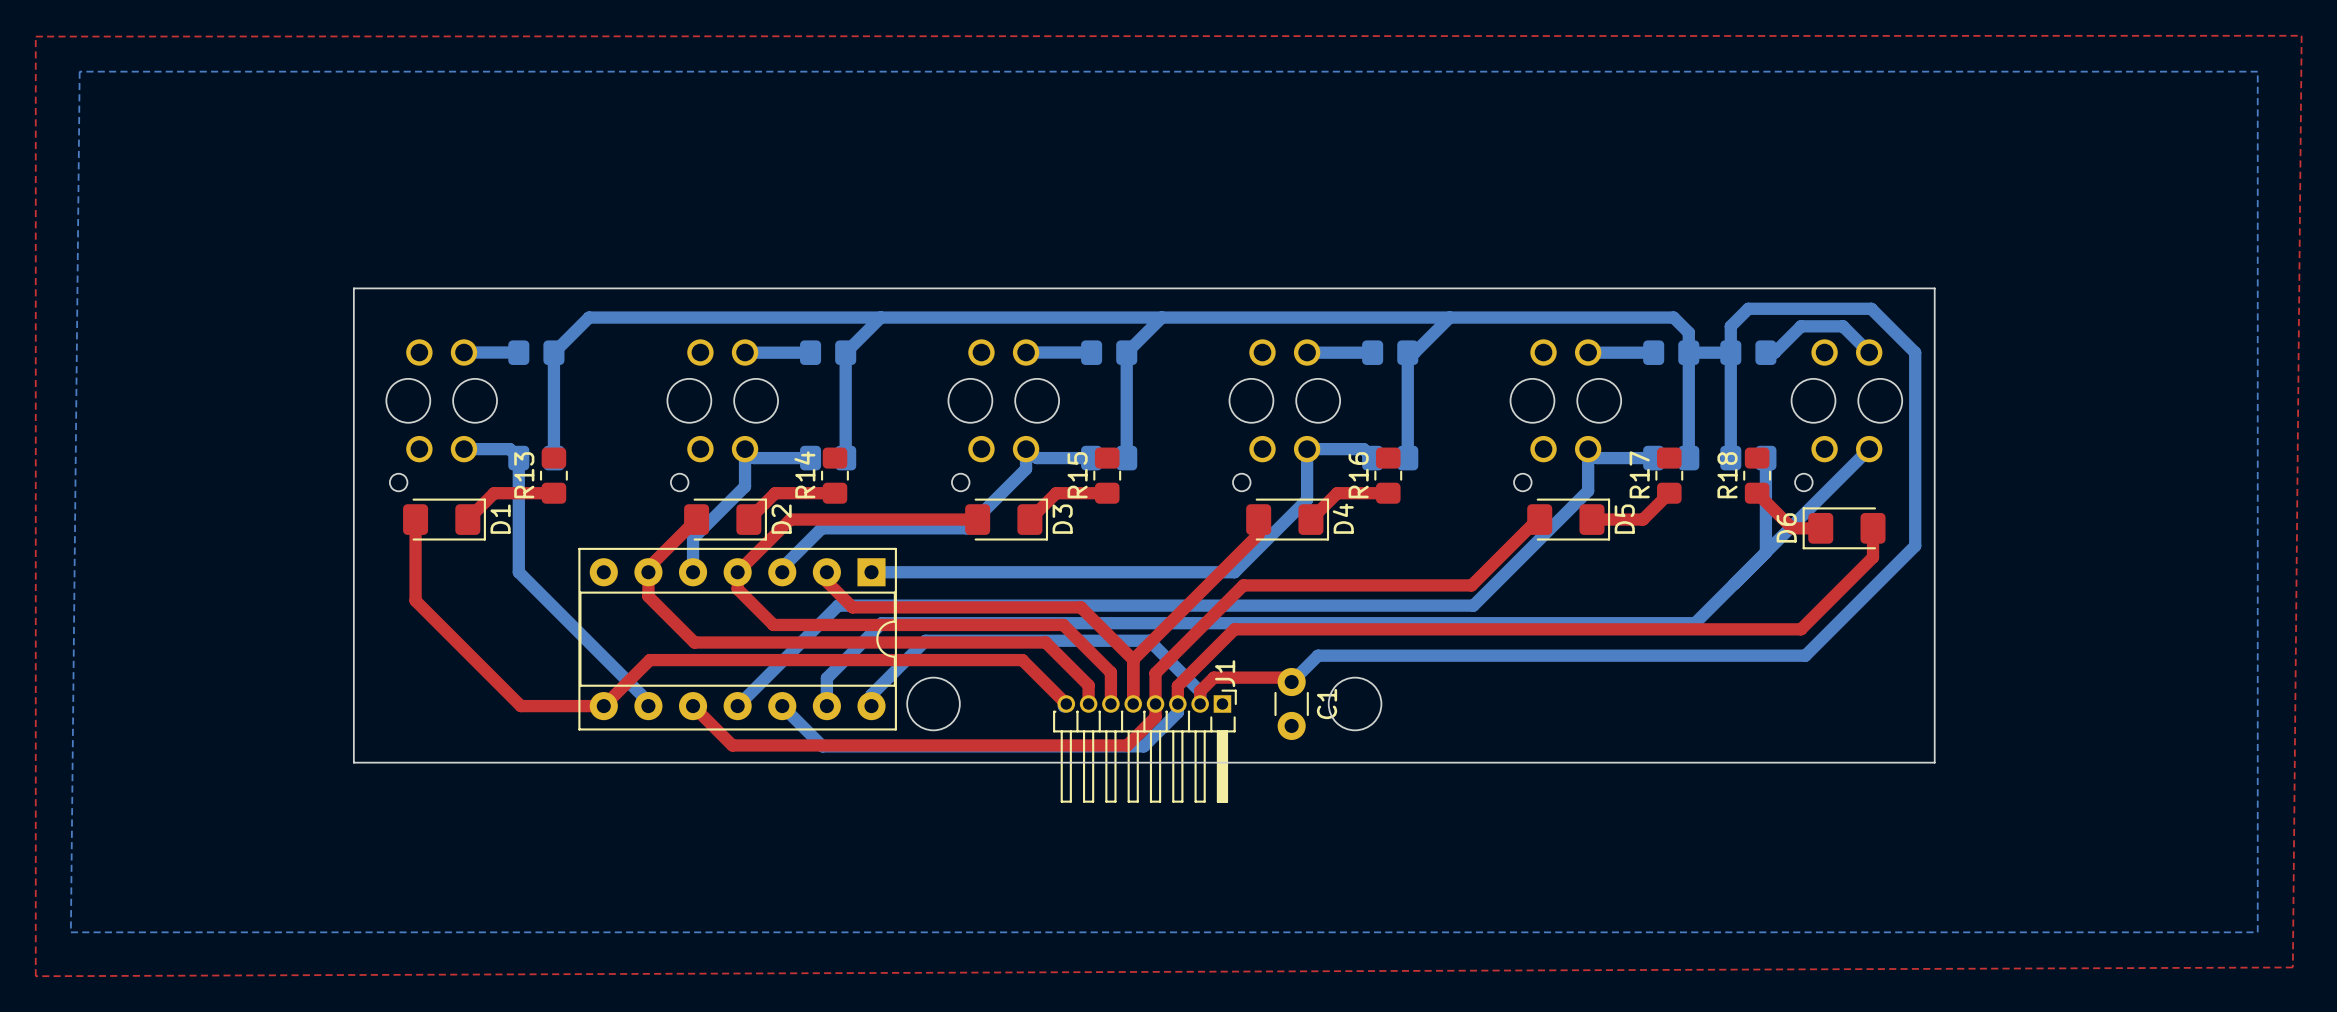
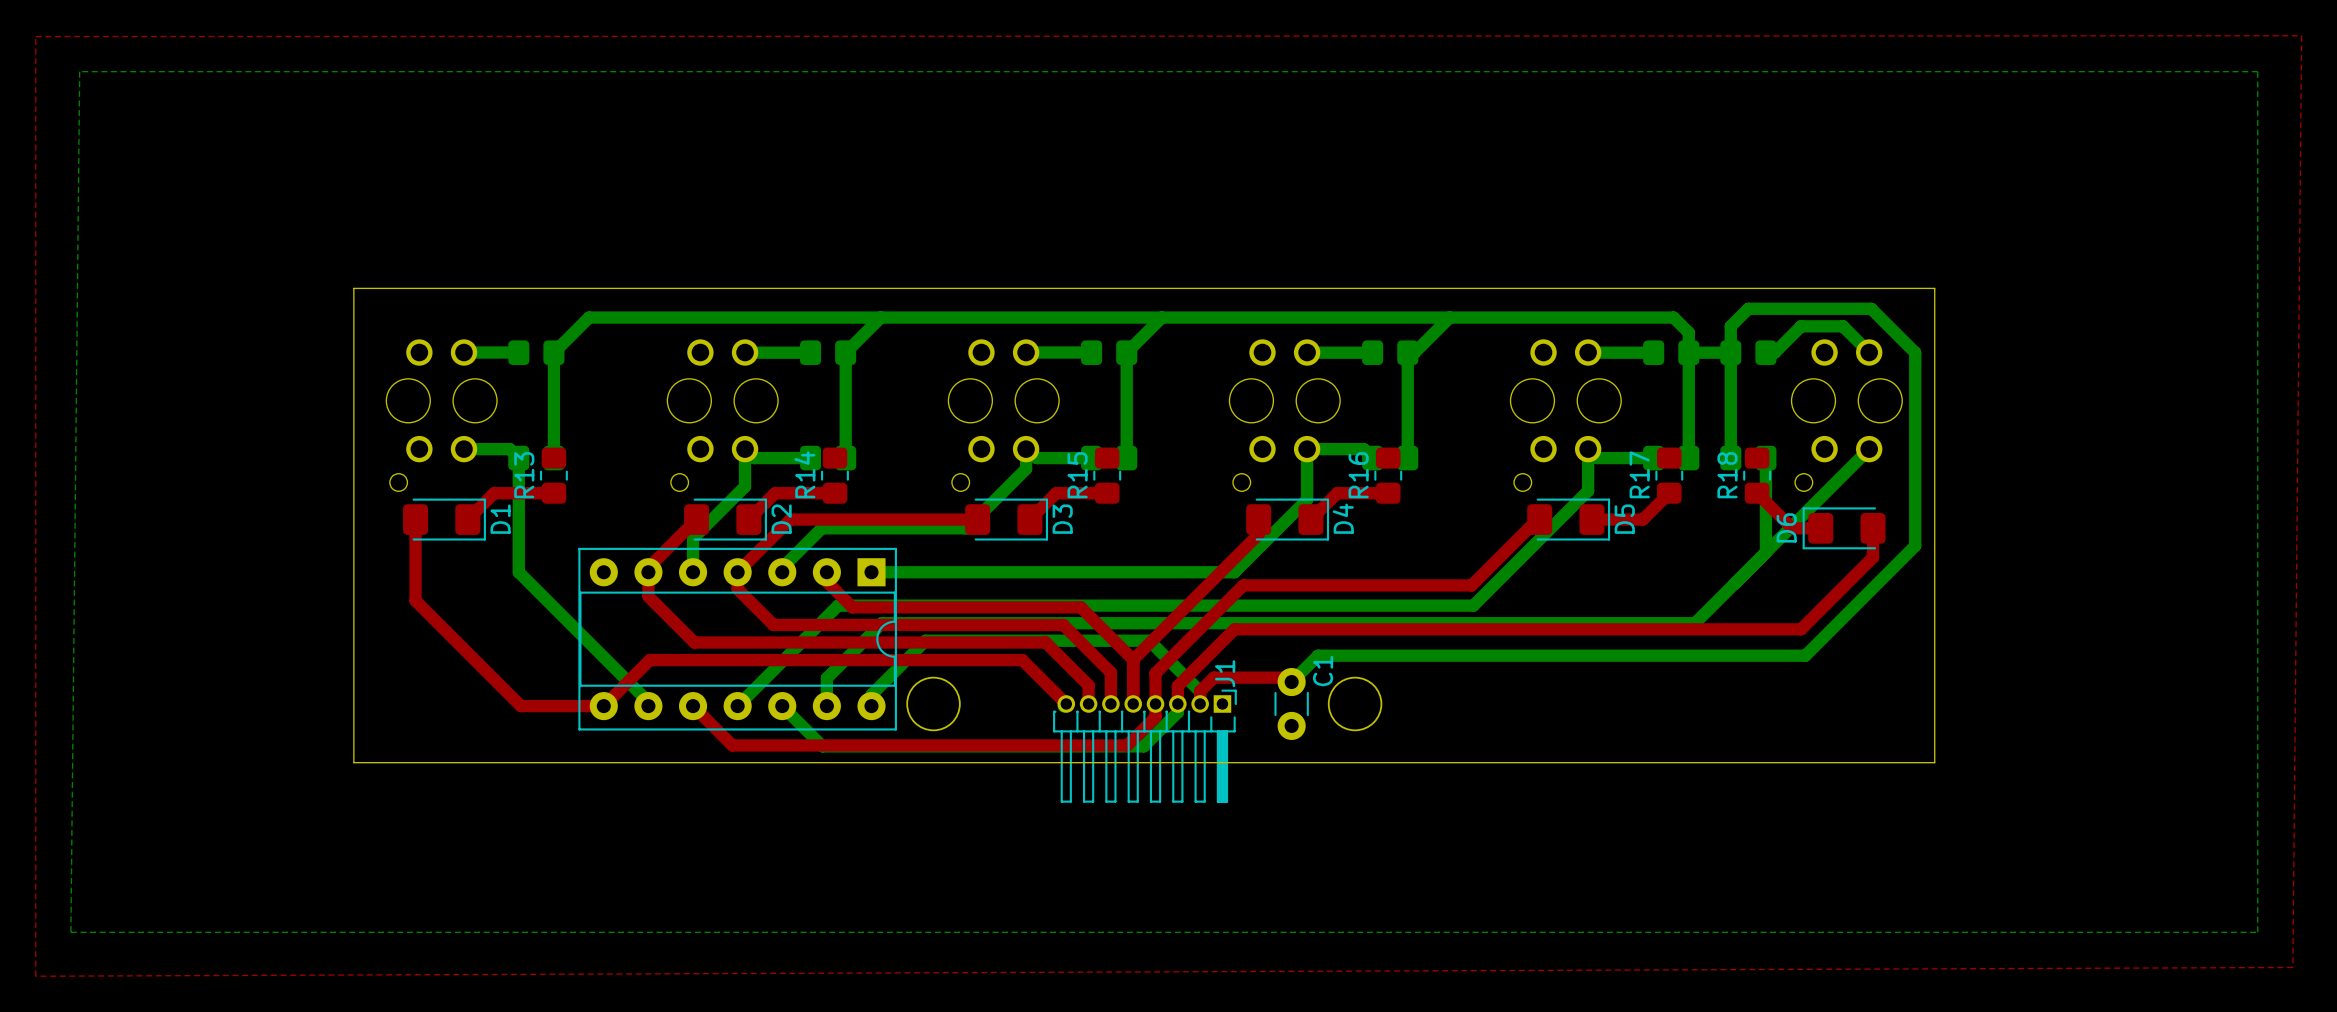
C1 name position: C1 (1327, 703) -> C1 (1323, 671)

